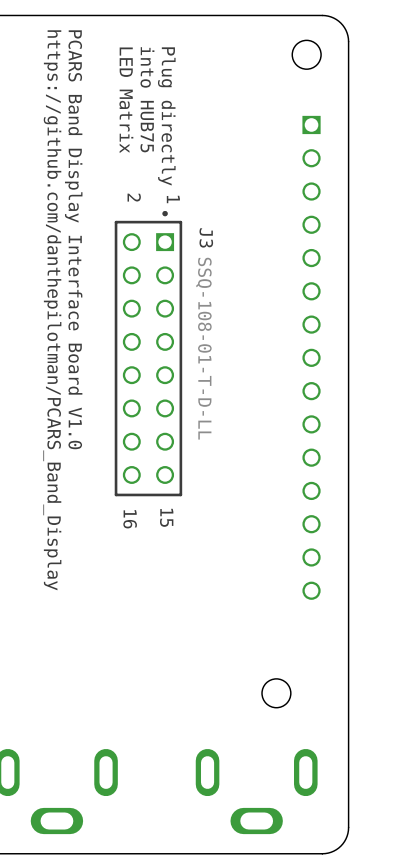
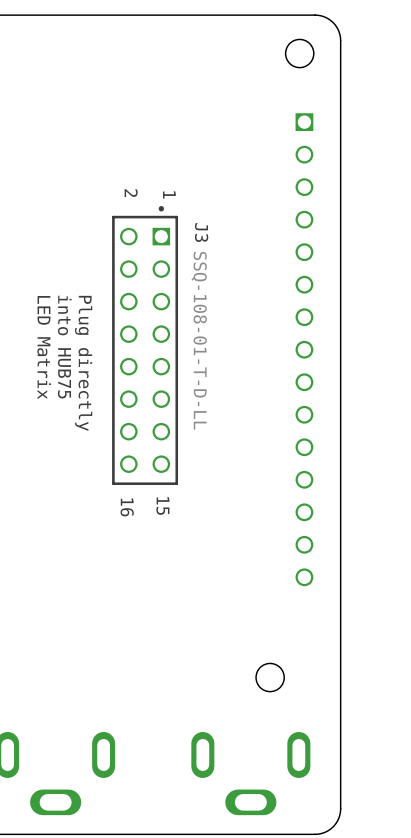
text position: into HUB75 (147, 99) -> into HUB75 (64, 347)
text position: LED Matrix (126, 100) -> LED Matrix (44, 347)
text position: Plug directly (166, 116) -> Plug directly (83, 363)
text: PCARS Band Display Interface Board V1.0 (73, 239) -> none
text: https://github.com/danthepilotman/PCARS_Band_Display (52, 310) -> none

